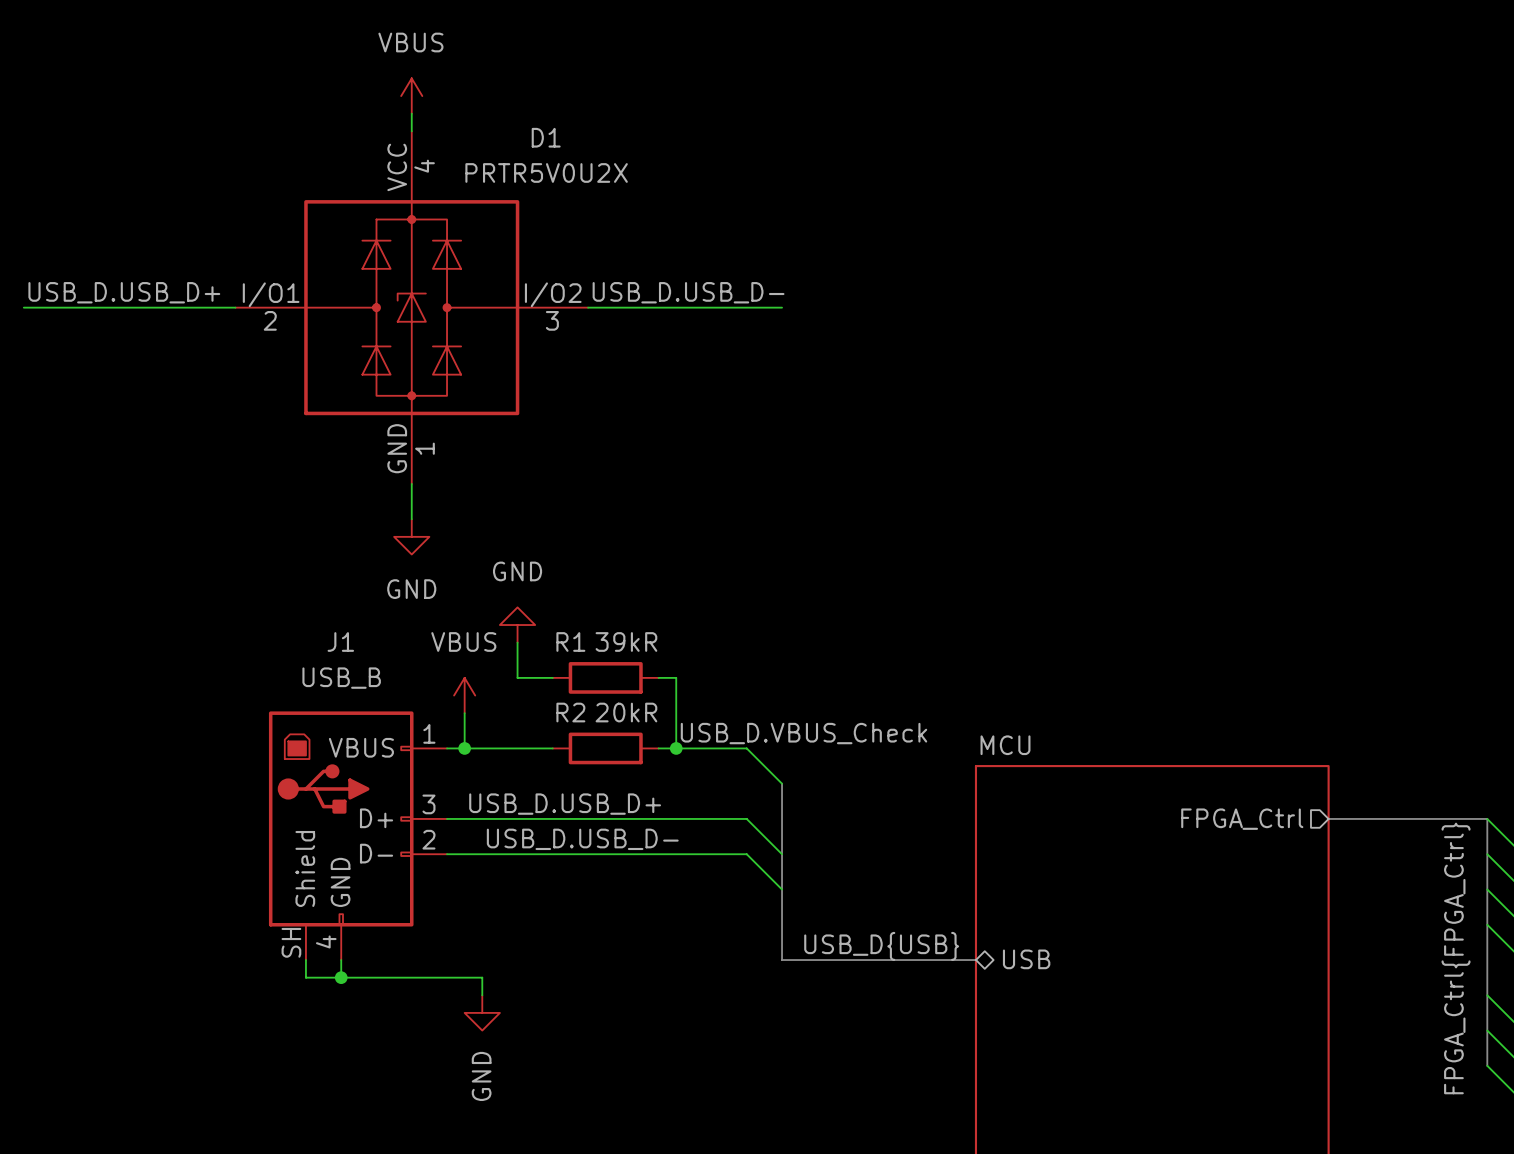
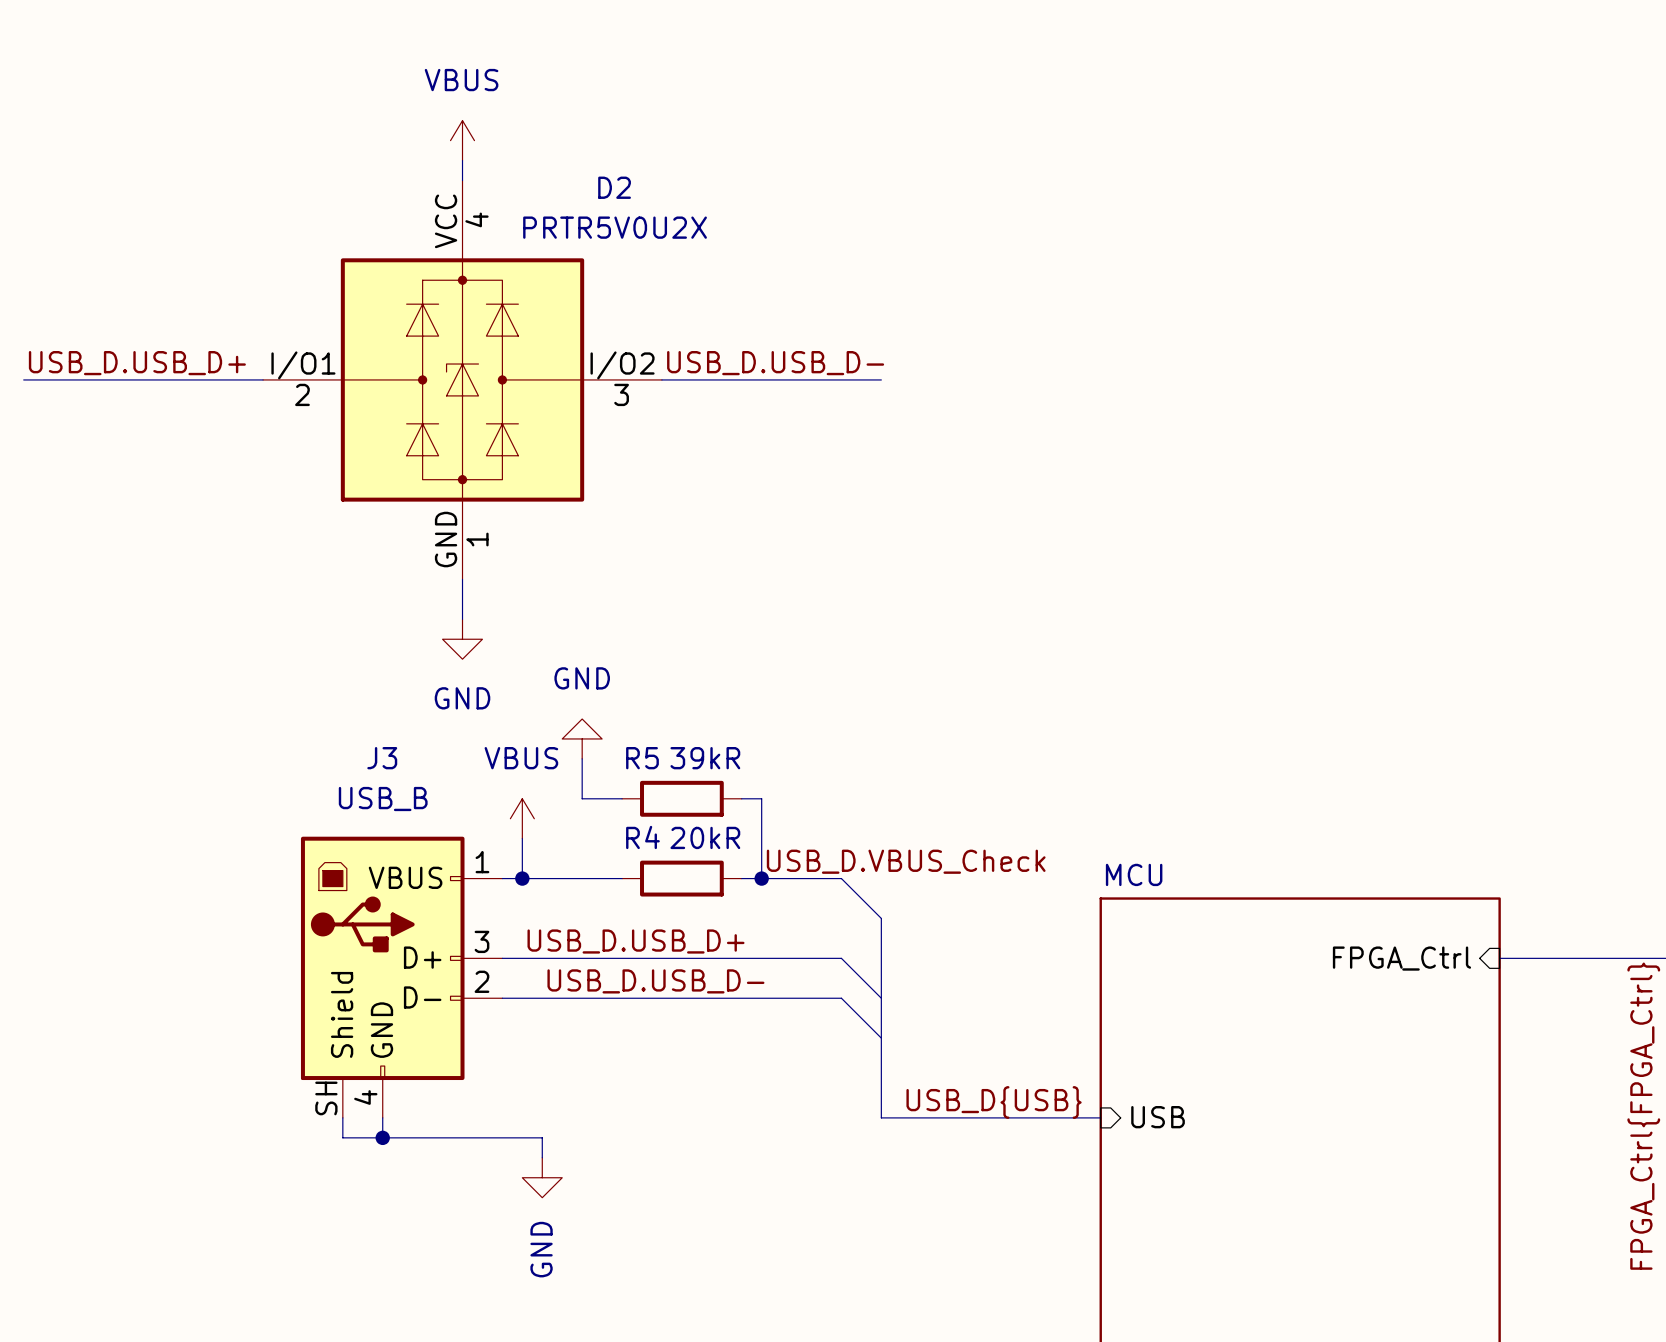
D1 name: D1 (546, 137) -> D2 (614, 187)
J1 name: J1 (340, 641) -> J3 (382, 758)
R1 name: R1 (570, 641) -> R5 (642, 758)
R2 name: R2 (570, 712) -> R4 (642, 837)
sheet pin shape: output (1242, 819) -> input (1401, 958)
sheet pin shape: bidirectional (1026, 959) -> input (1158, 1117)

